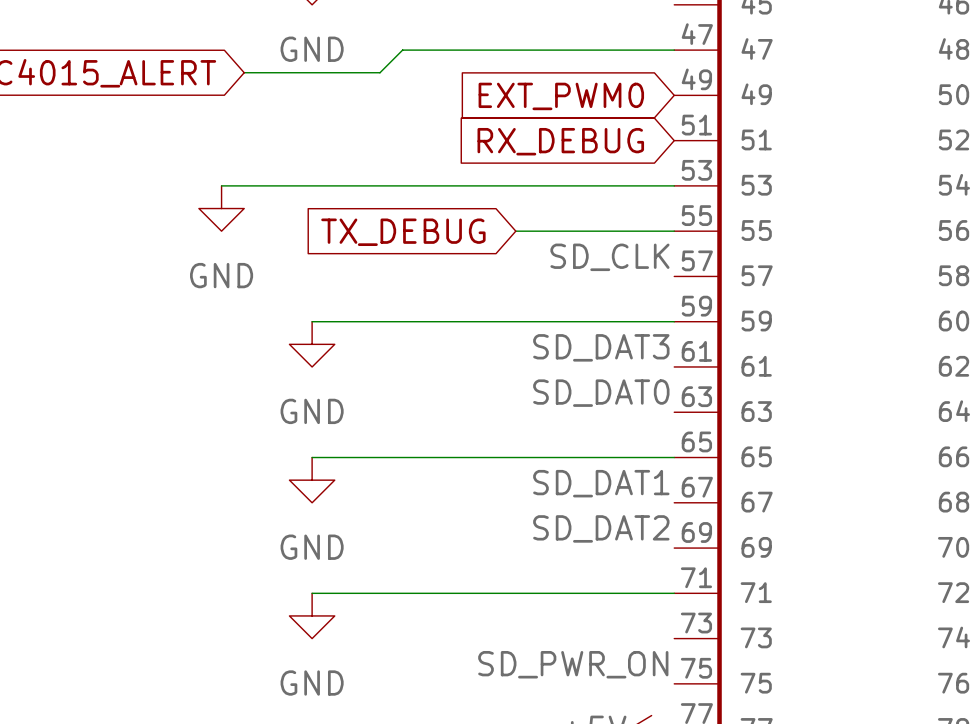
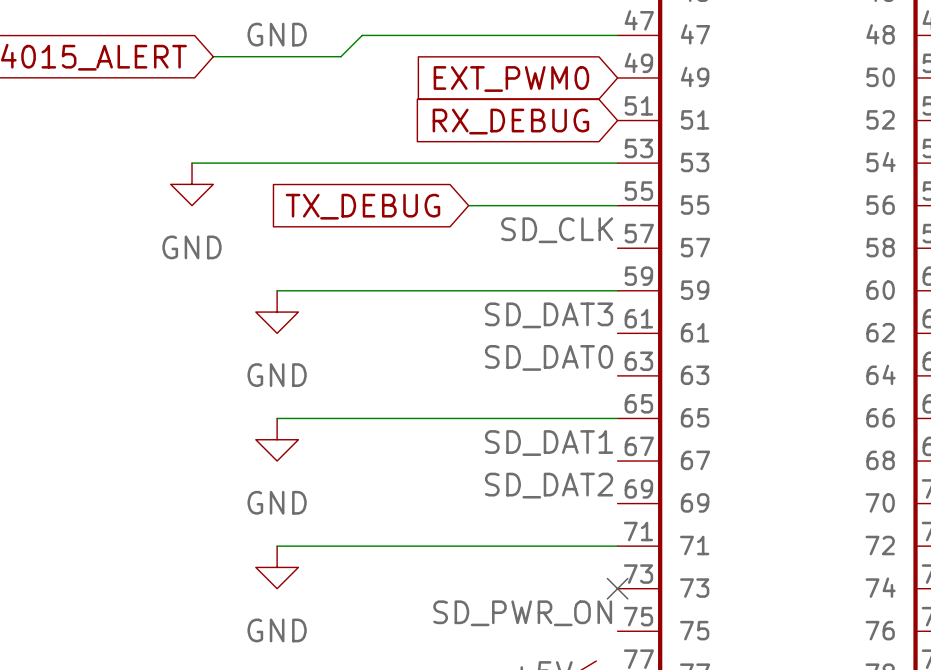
no-connect mark: none -> (617, 588)

